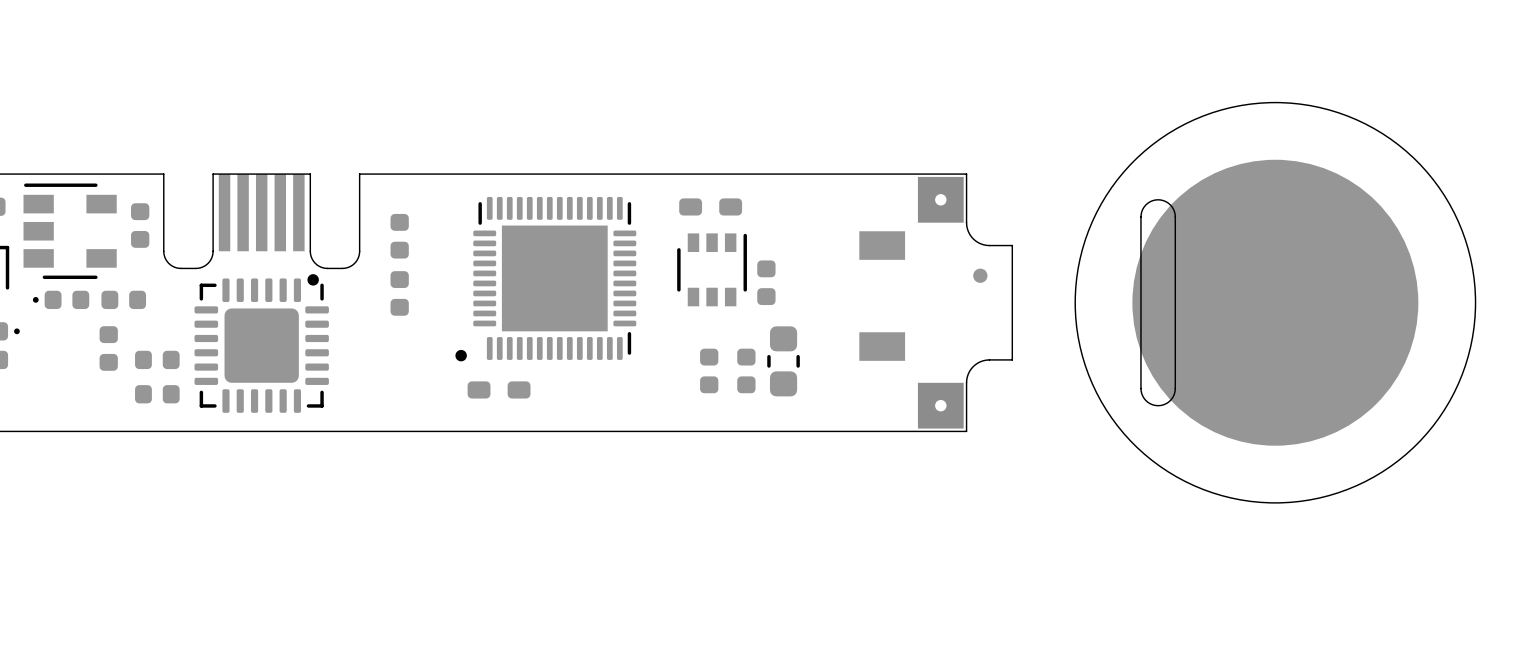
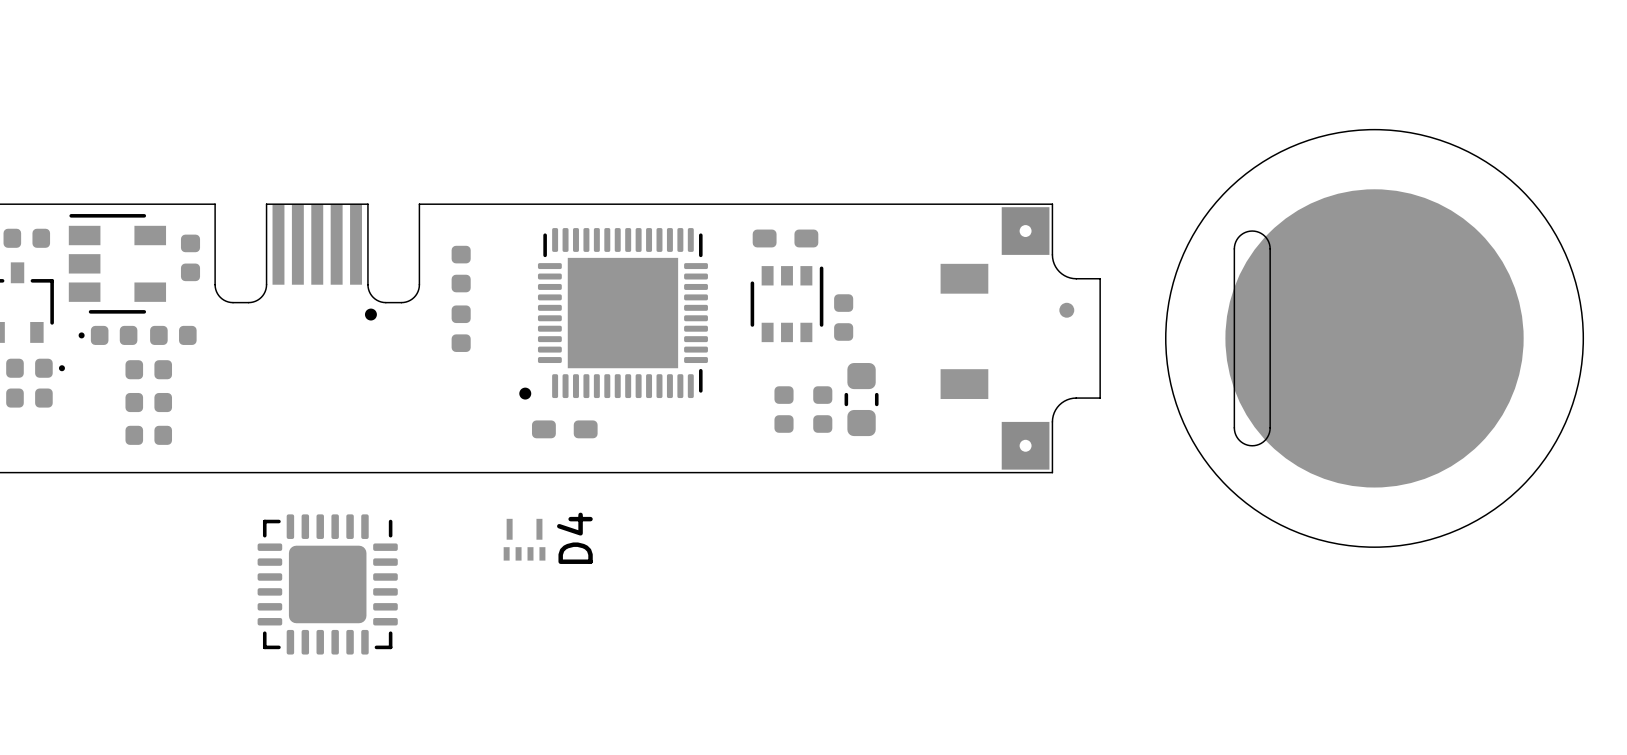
part: none -> (148, 369)
part position: (261, 345) -> (327, 584)
part: (108, 348) -> none
part: (157, 359) -> none
part: none -> (148, 402)
part: (157, 394) -> none
part: none -> (148, 435)
D4: none -> (524, 539)

